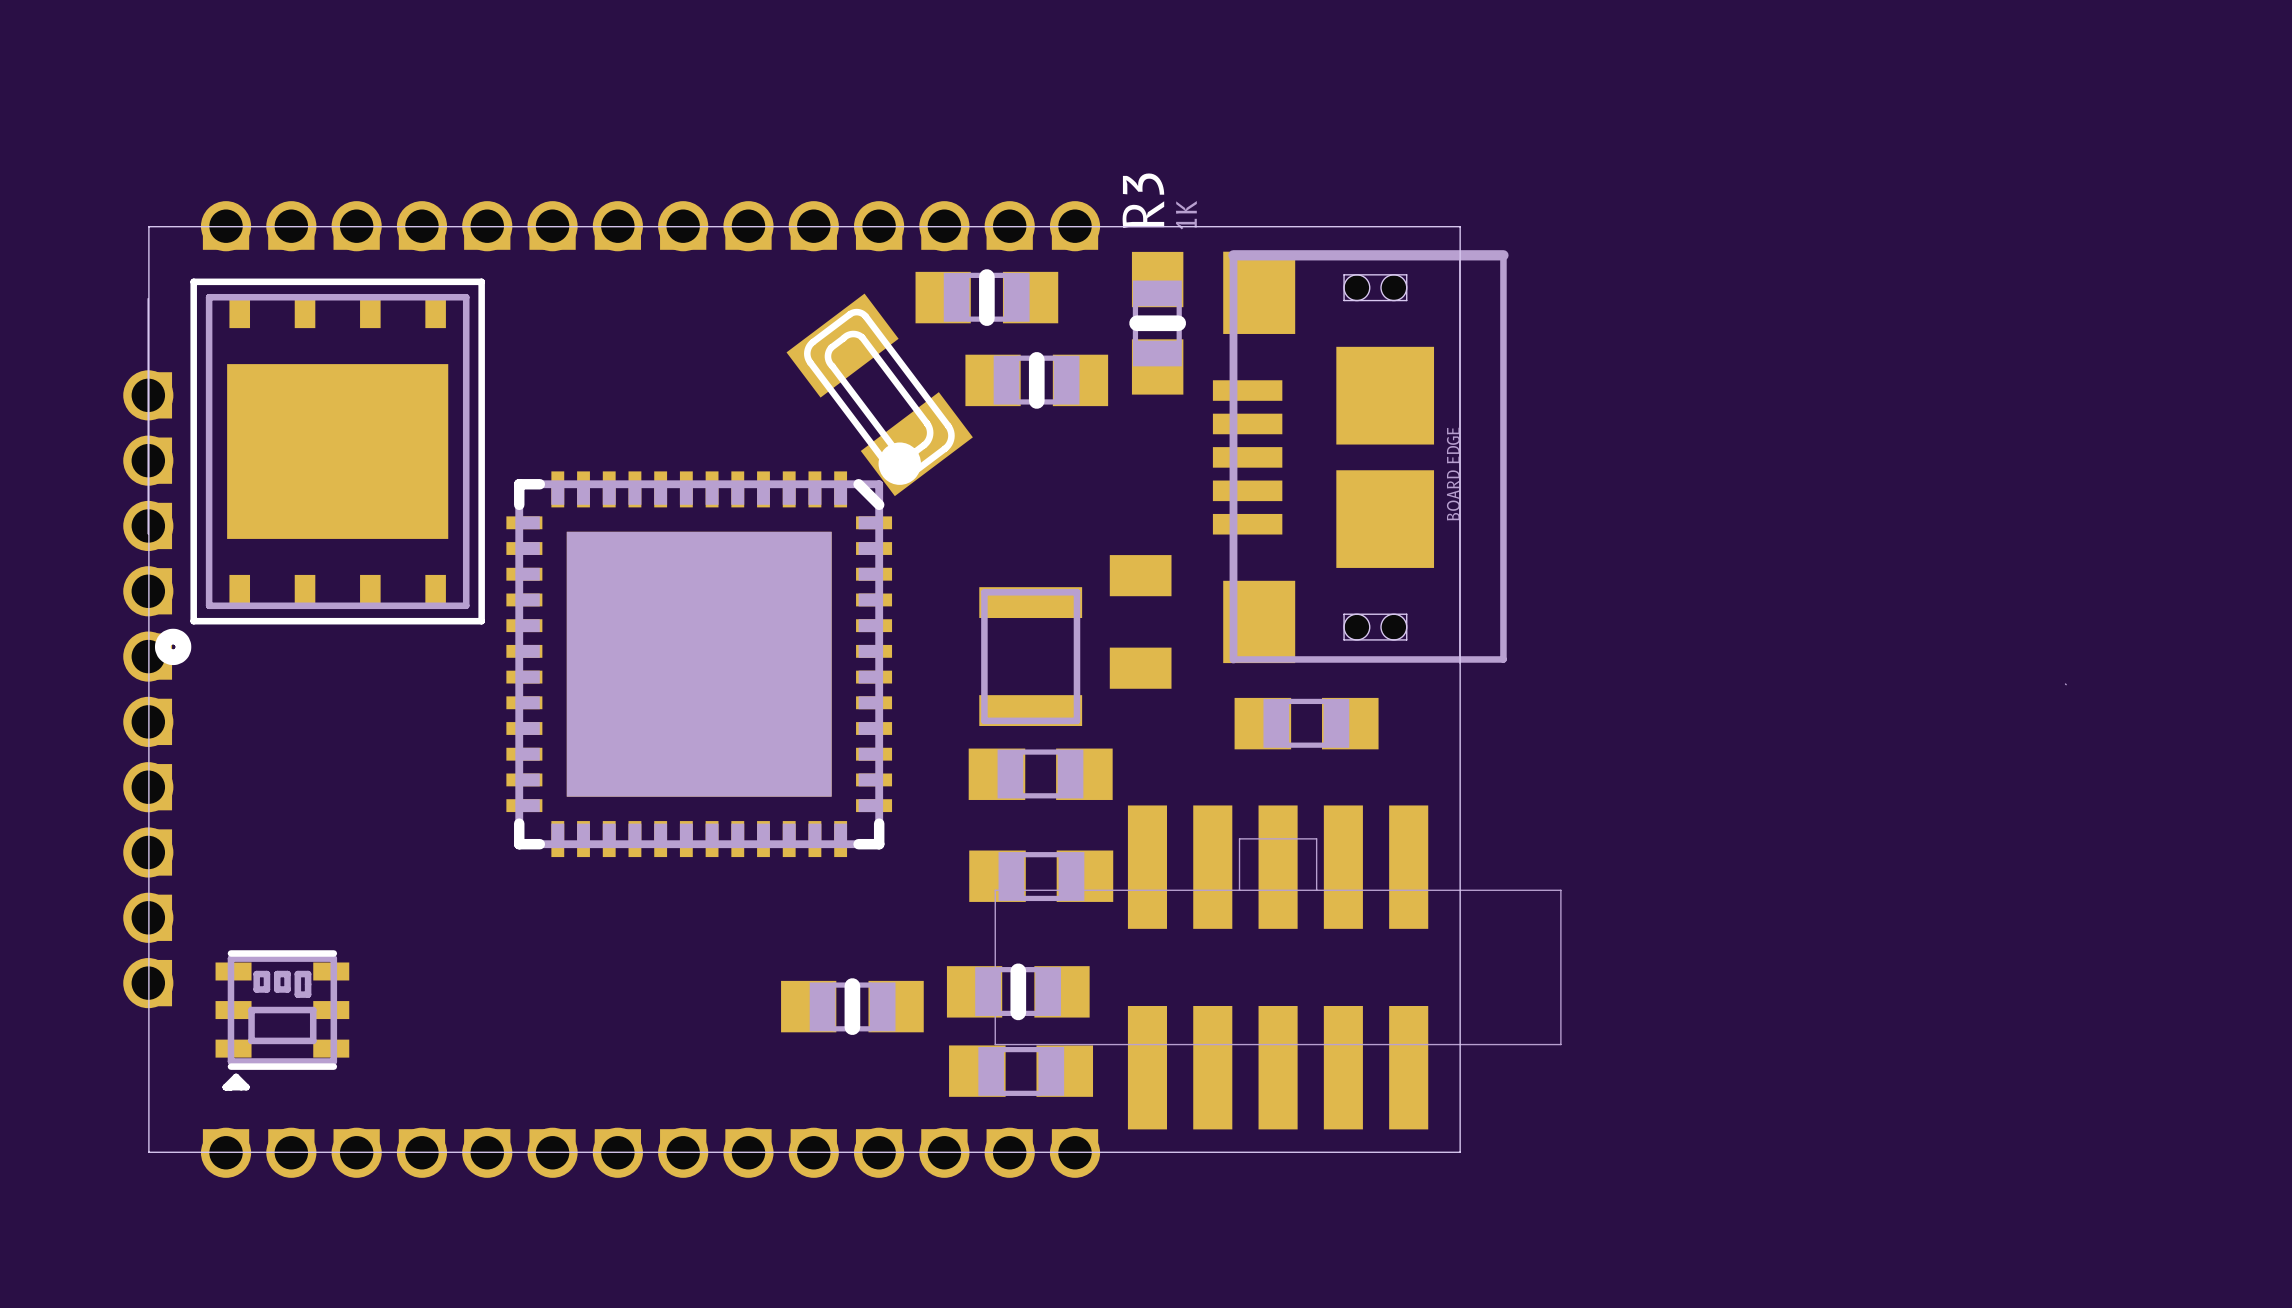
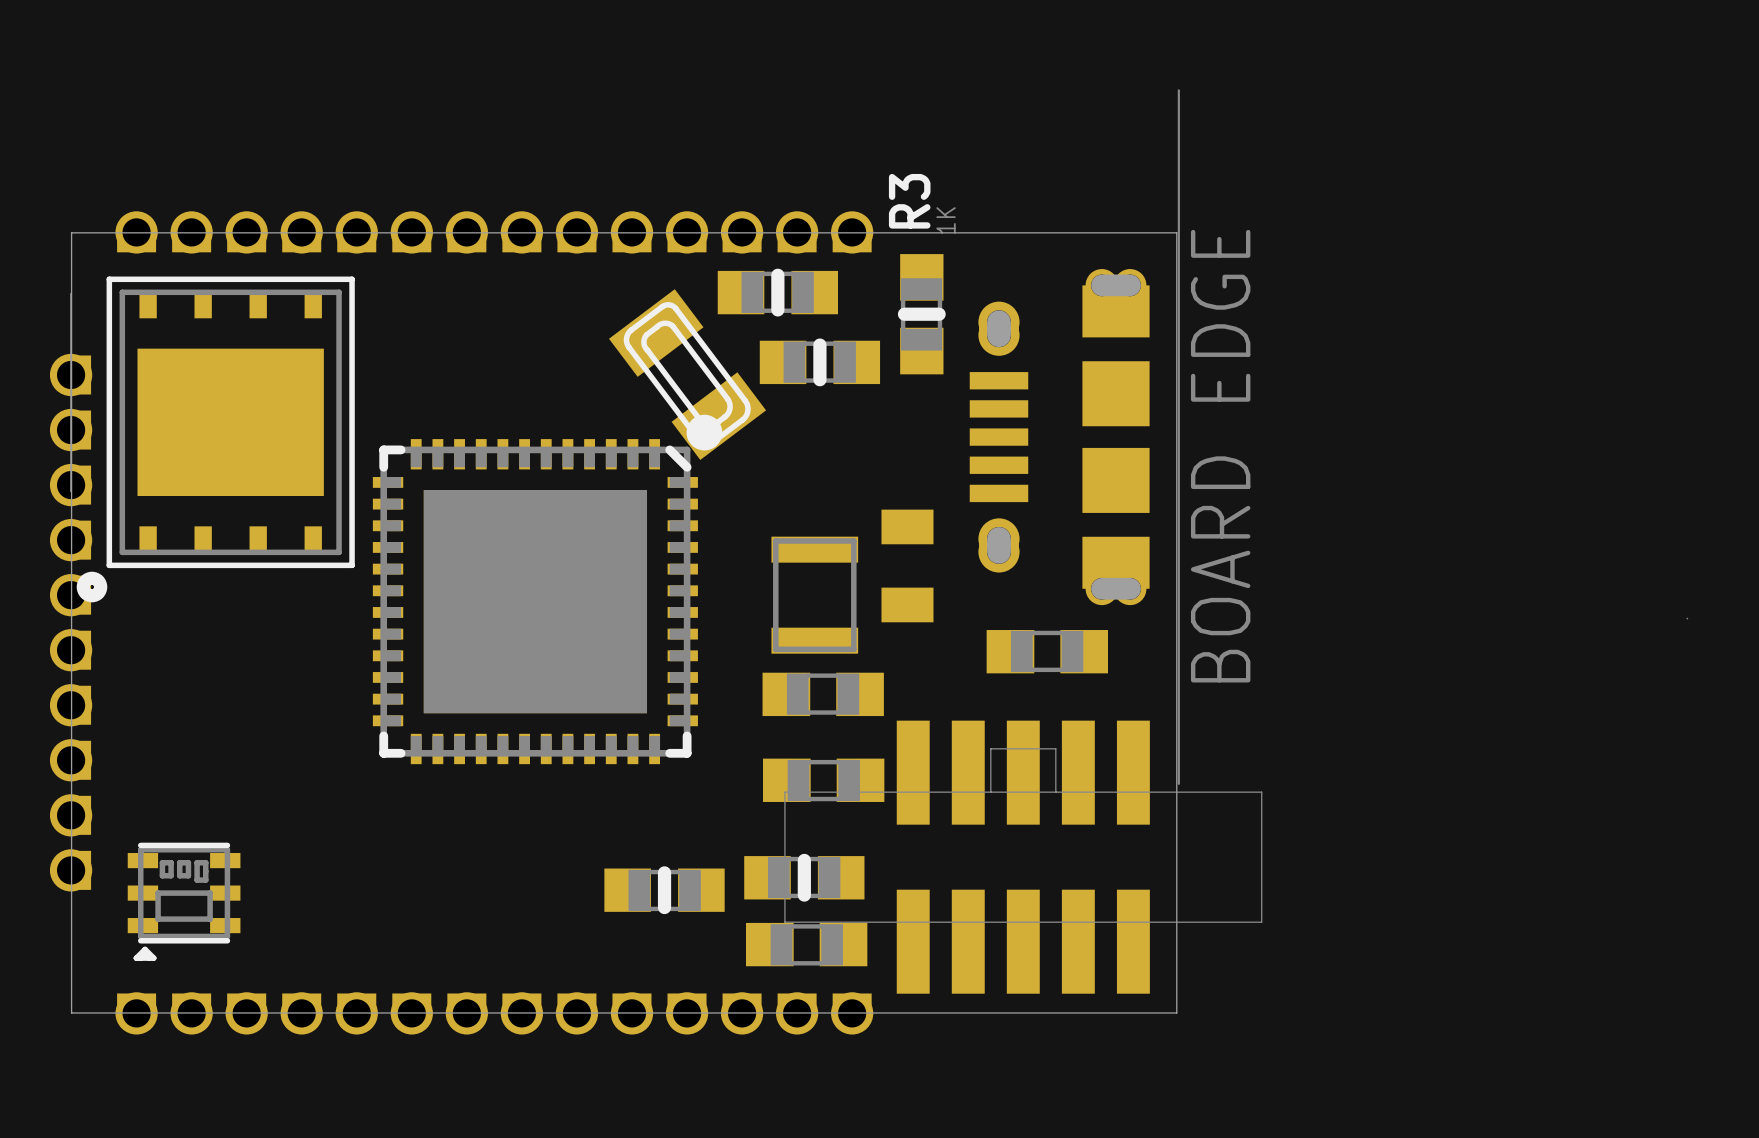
part footprint: [1212, 250, 1509, 664] -> [969, 89, 1180, 785]

